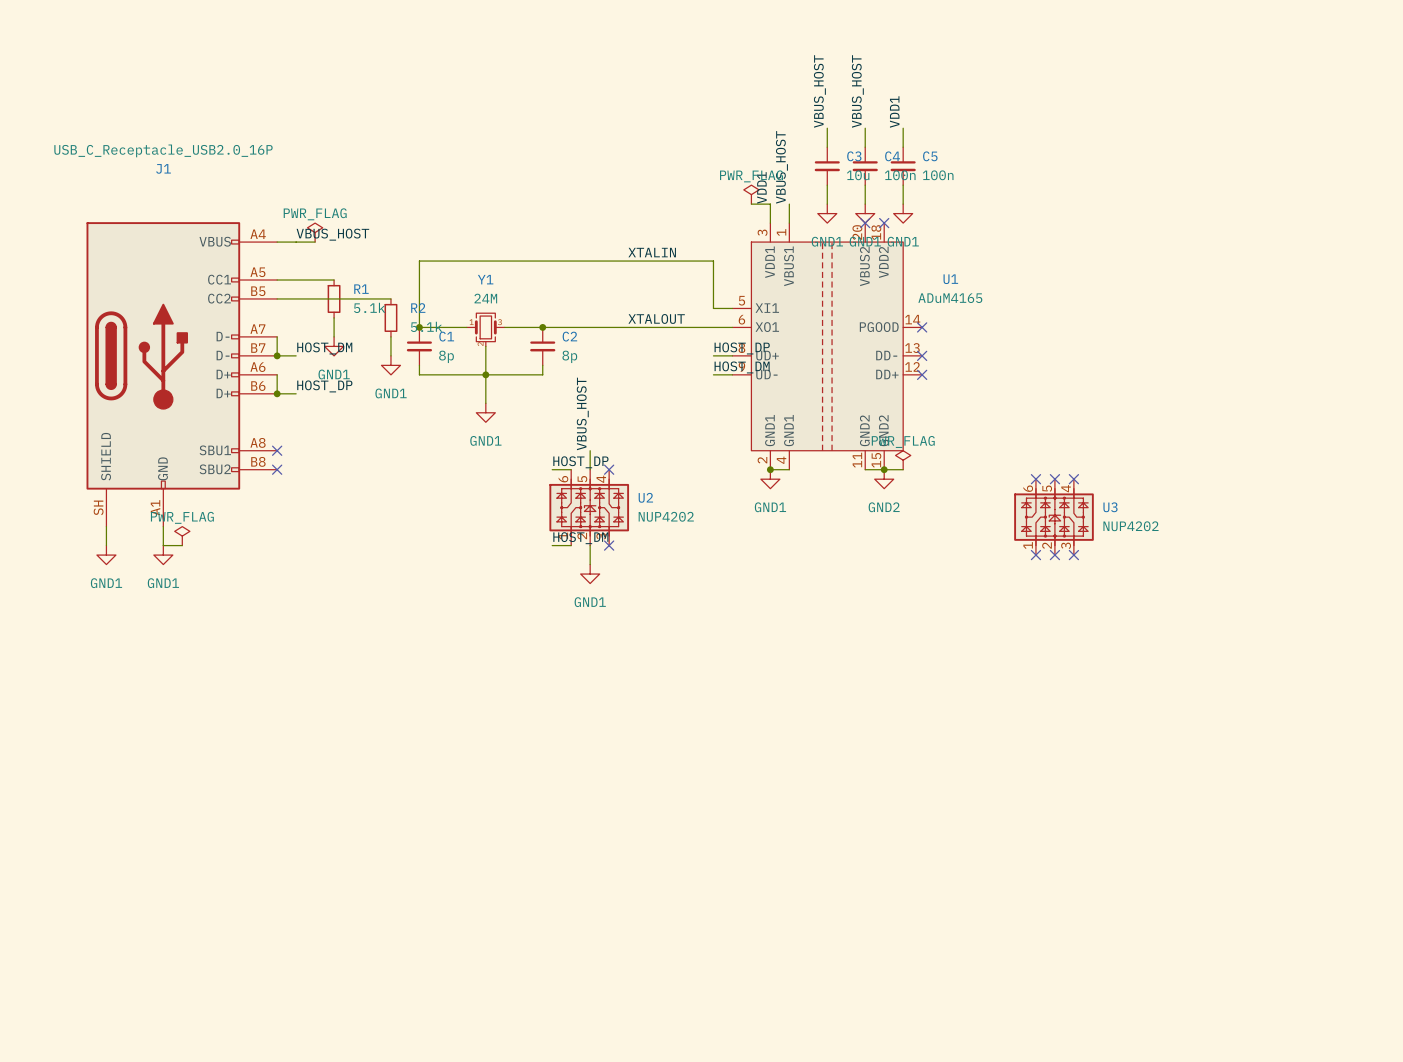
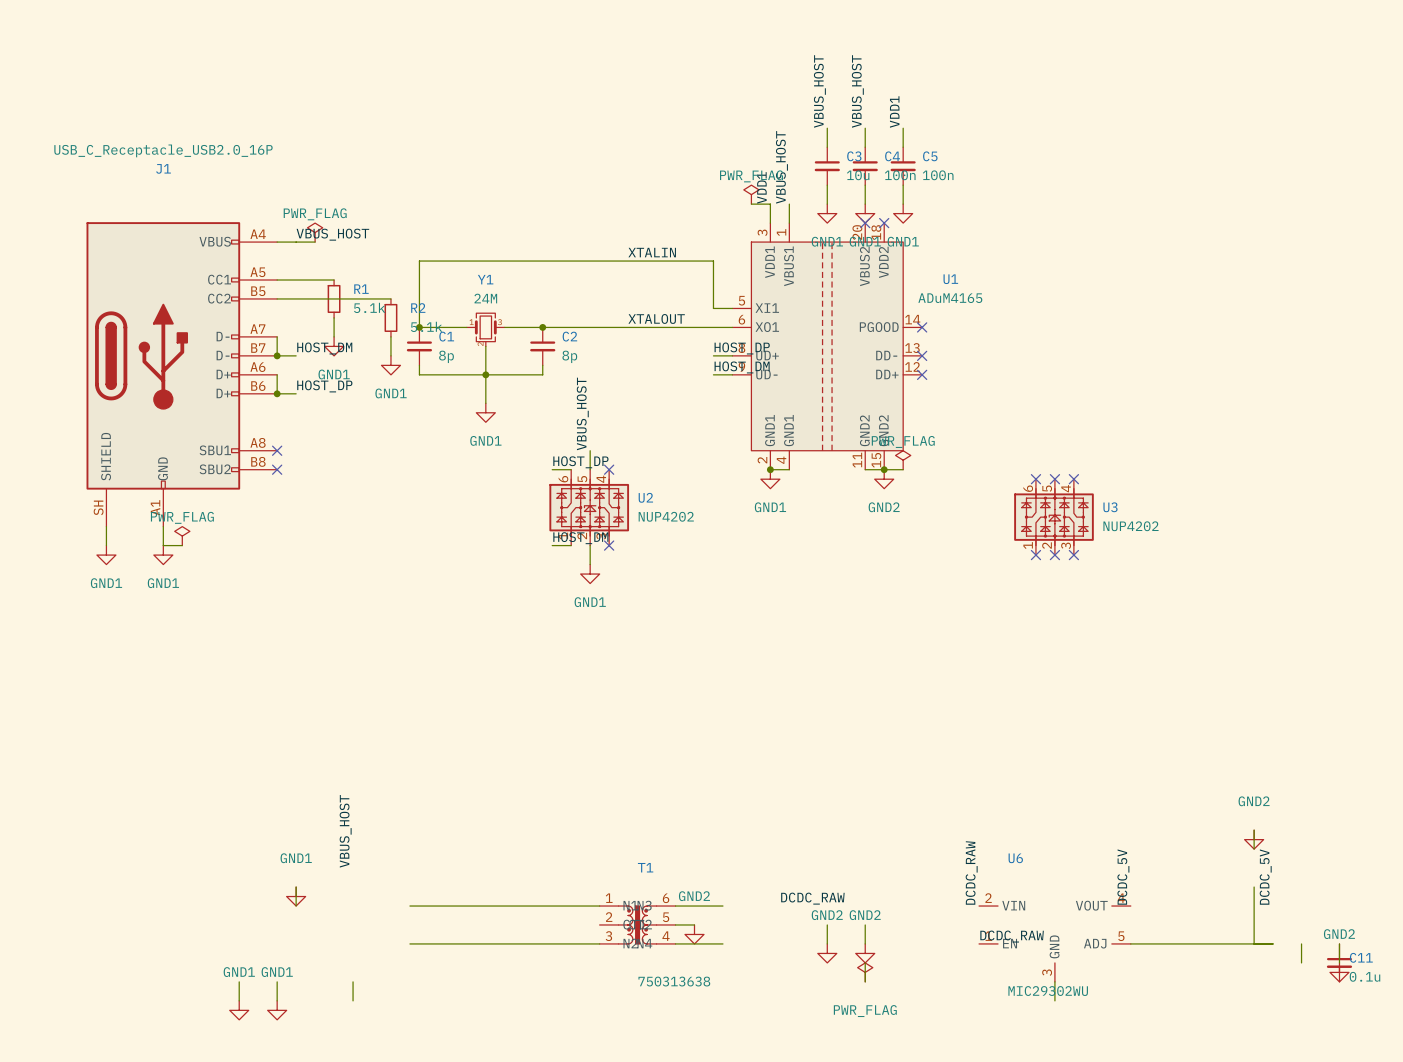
wire: none -> (1254, 830) (1254, 849)
label: none -> VBUS_HOST (345, 831)
power symbol: none -> GND2 (1254, 839)
label: none -> DCDC_RAW (971, 872)
label: none -> DCDC_5V (1123, 877)
label: none -> DCDC_5V (1265, 877)
wire: none -> (296, 887) (296, 906)
wire: none -> (1254, 887) (1254, 943)
power symbol: none -> GND1 (296, 896)
label: none -> DCDC_RAW (812, 898)
wire: none -> (409, 906) (599, 906)
wire: none -> (675, 906) (722, 906)
T1: none -> 750313638 (637, 924)
wire: none -> (675, 924) (694, 924)
wire: none -> (827, 924) (827, 943)
wire: none -> (865, 924) (865, 943)
power symbol: none -> GND2 (694, 934)
label: none -> DCDC_RAW (1012, 936)
wire: none -> (409, 943) (599, 943)
wire: none -> (675, 943) (722, 943)
U6: none -> MIC29302WU (1054, 943)
wire: none -> (1130, 943) (1273, 943)
wire: none -> (1301, 943) (1301, 962)
wire: none -> (1339, 943) (1339, 962)
power symbol: none -> GND2 (827, 953)
power symbol: none -> GND2 (865, 953)
wire: none -> (865, 962) (865, 981)
C11: none -> 0.1u (1339, 962)
power symbol: none -> PWR_FLAG (865, 972)
power symbol: none -> GND2 (1339, 972)
wire: none -> (239, 981) (239, 1000)
wire: none -> (277, 981) (277, 1000)
wire: none -> (353, 981) (353, 1000)
wire: none -> (1054, 981) (1054, 1000)
power symbol: none -> GND1 (239, 1010)
power symbol: none -> GND1 (277, 1010)

